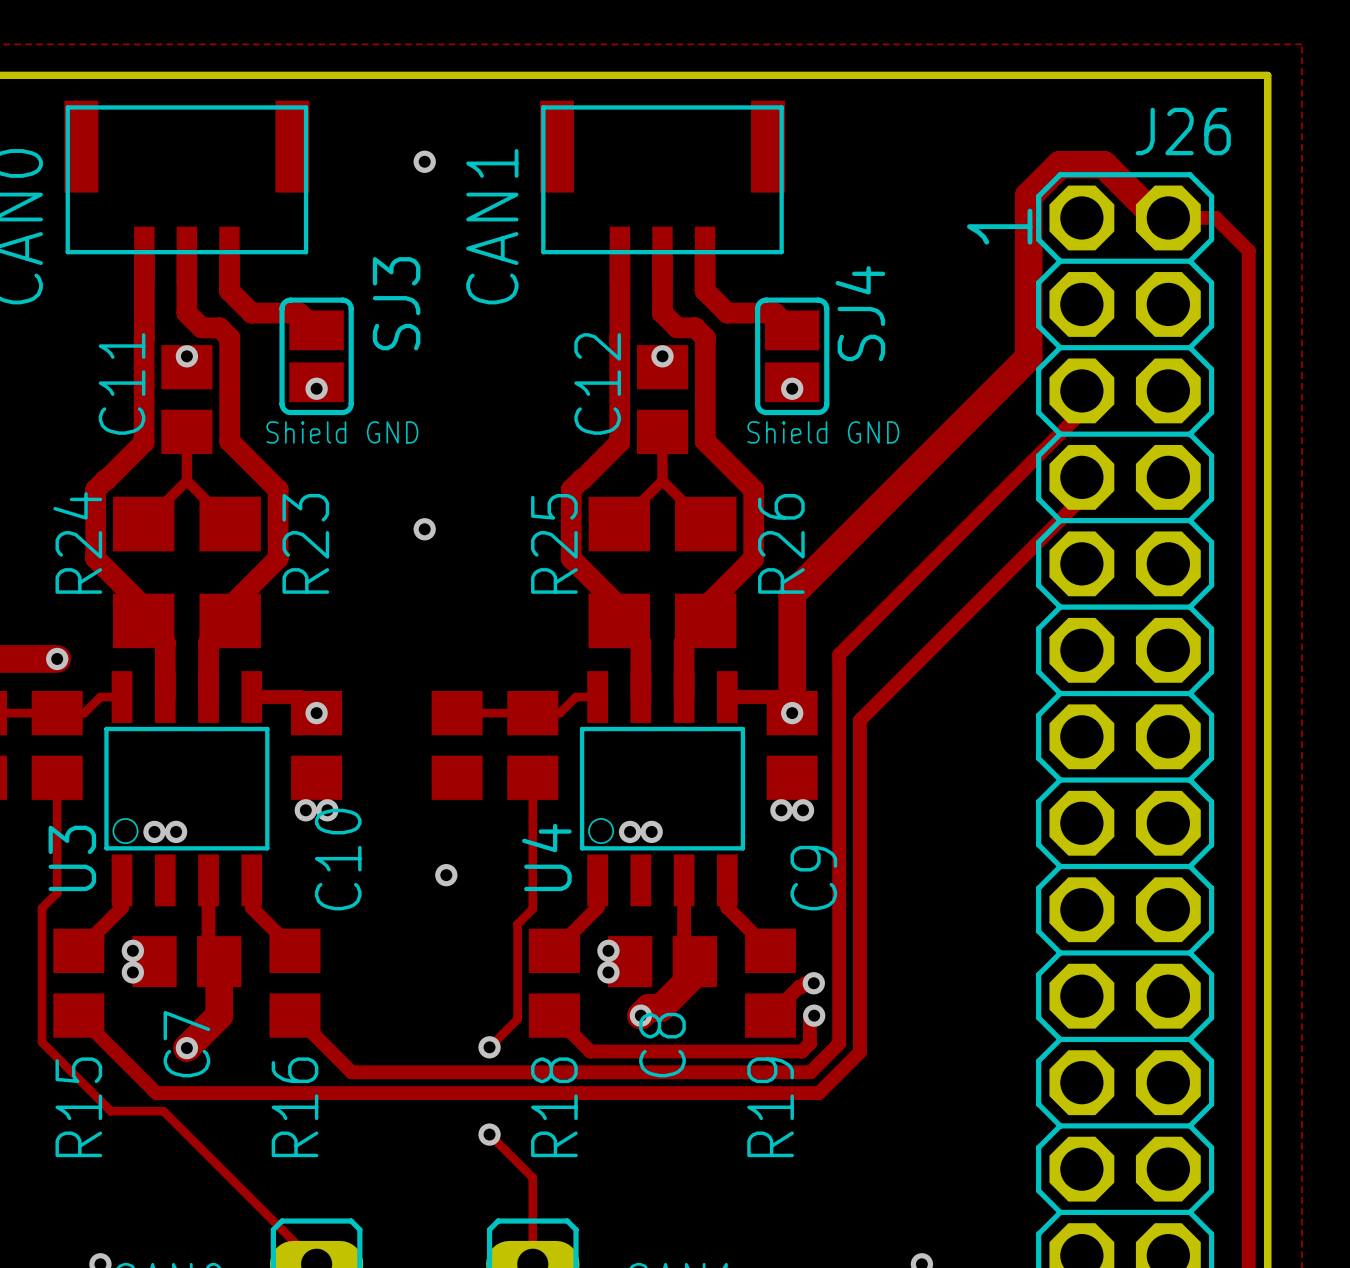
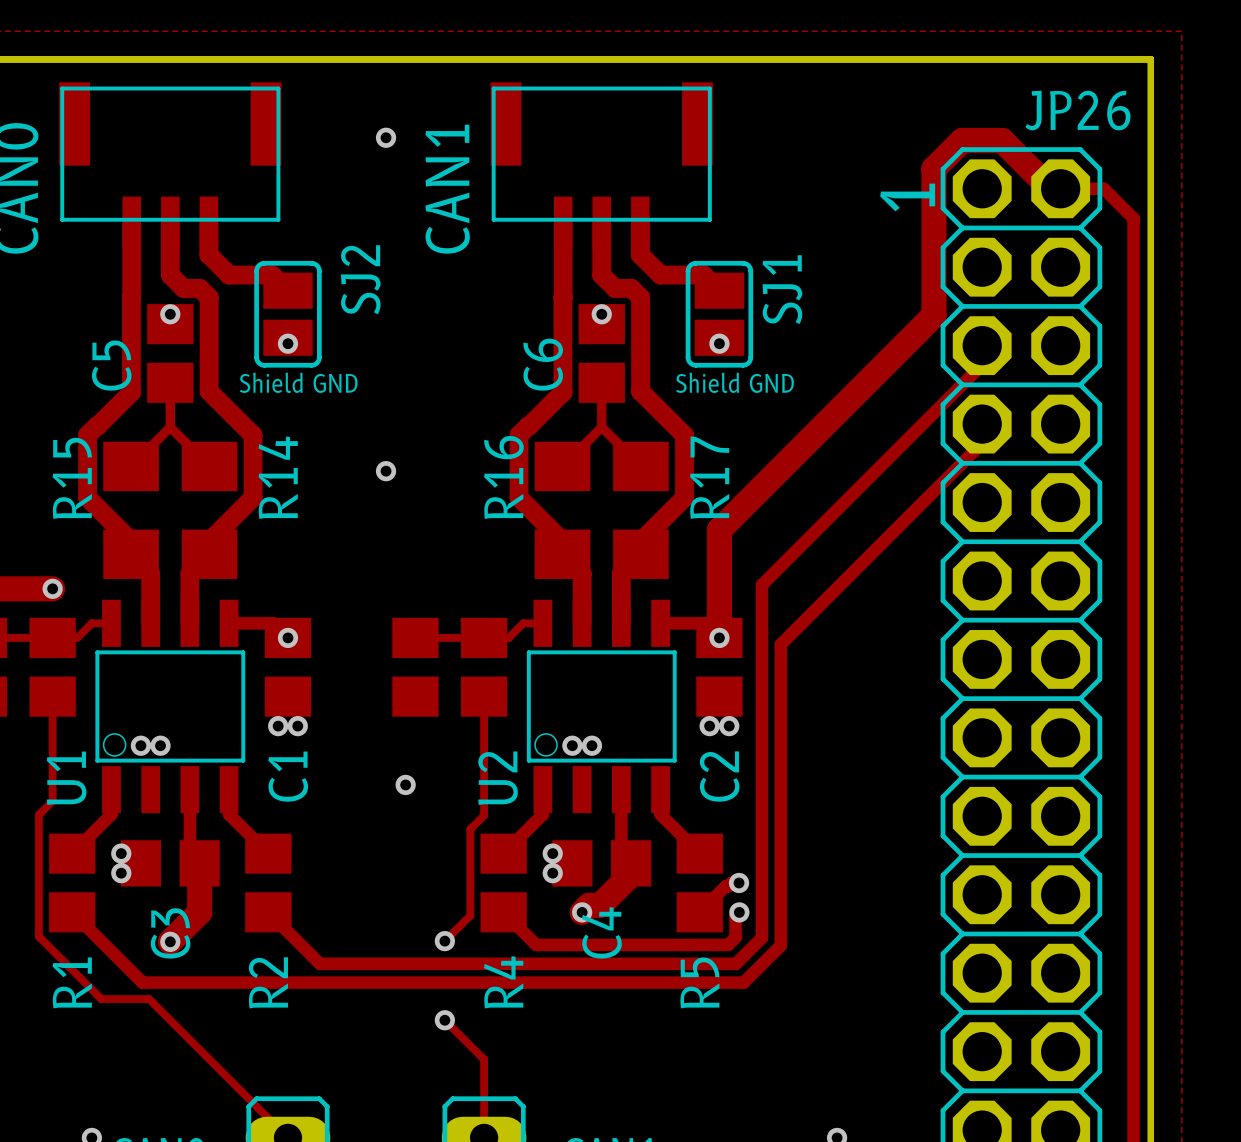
J26 name: J26 (1183, 131) -> JP26 (1077, 110)
SJ3 name: SJ3 (396, 303) -> SJ2 (360, 279)
SJ4 name: SJ4 (860, 313) -> SJ1 (782, 289)
C11 name: C11 (122, 384) -> C5 (111, 365)
C12 name: C12 (597, 384) -> C6 (543, 364)
R24 name: R24 (77, 542) -> R15 (72, 478)
R23 name: R23 (305, 543) -> R14 (278, 477)
R25 name: R25 (554, 543) -> R16 (503, 477)
R26 name: R26 (781, 543) -> R17 (709, 477)
U4 name: U4 (546, 857) -> U2 (498, 778)
U3 name: U3 (72, 858) -> U1 (66, 778)
C10 name: C10 (338, 859) -> C1 (288, 776)
C9 name: C9 (813, 878) -> C2 (719, 776)
C7 name: C7 (186, 1044) -> C3 (170, 933)
C8 name: C8 (662, 1045) -> C4 (601, 932)
R15 name: R15 (78, 1107) -> R1 (72, 982)
R16 name: R16 (294, 1107) -> R2 (268, 982)
R18 name: R18 (554, 1107) -> R4 (503, 982)
R19 name: R19 (770, 1107) -> R5 (699, 982)

